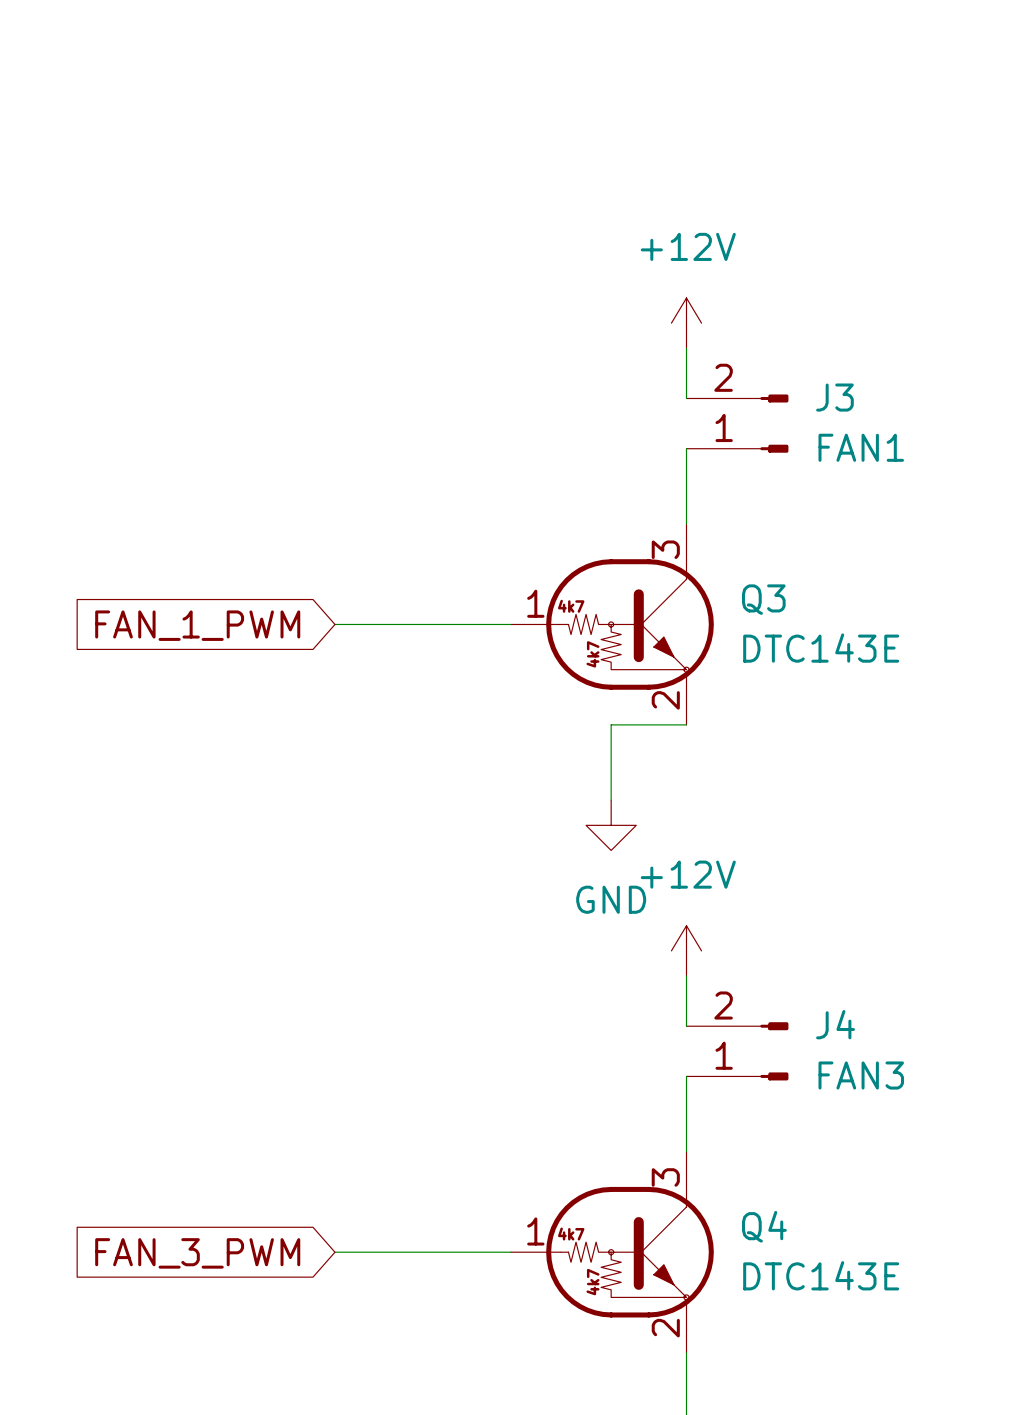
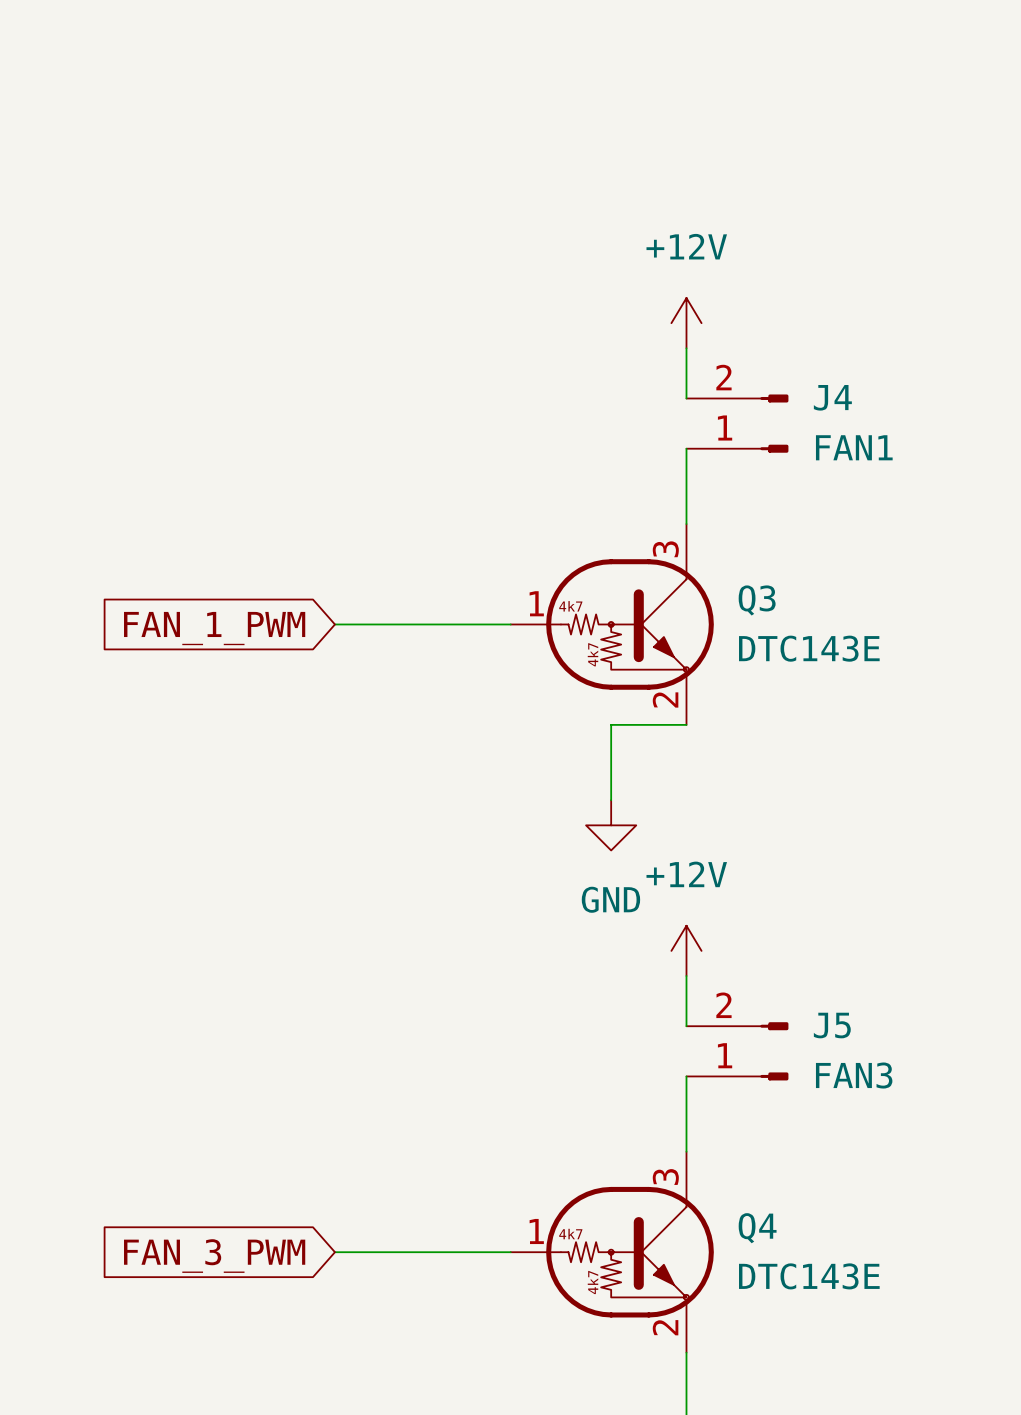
J3 name: J3 (834, 397) -> J4 (832, 397)
J4 name: J4 (835, 1024) -> J5 (832, 1025)

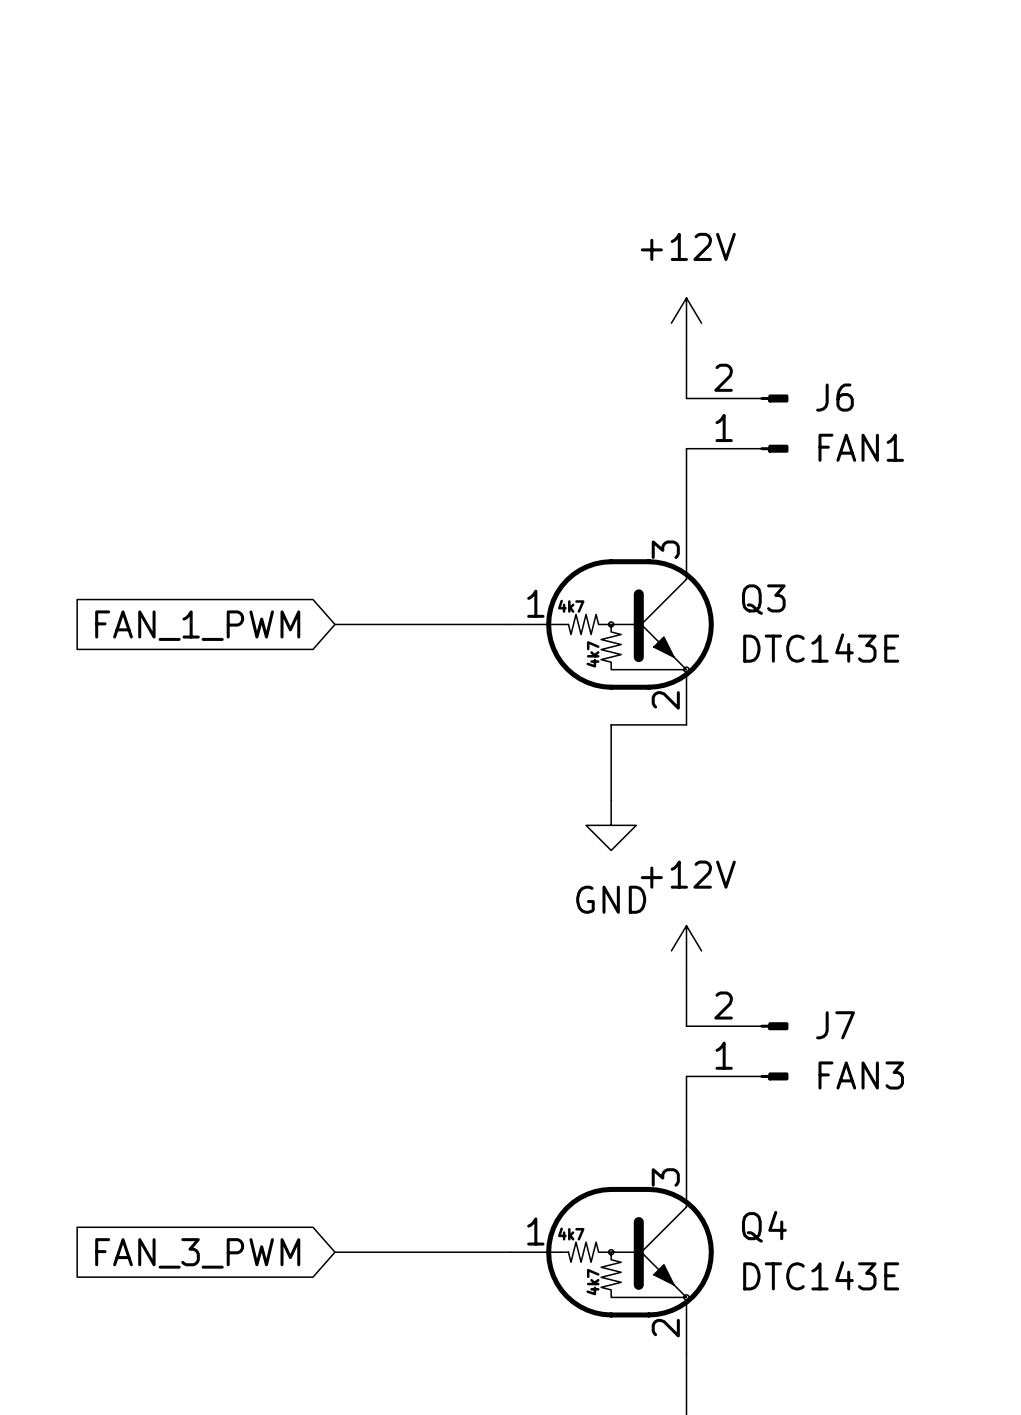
J4 name: J4 (832, 397) -> J6 (834, 397)
J5 name: J5 (832, 1025) -> J7 (835, 1025)

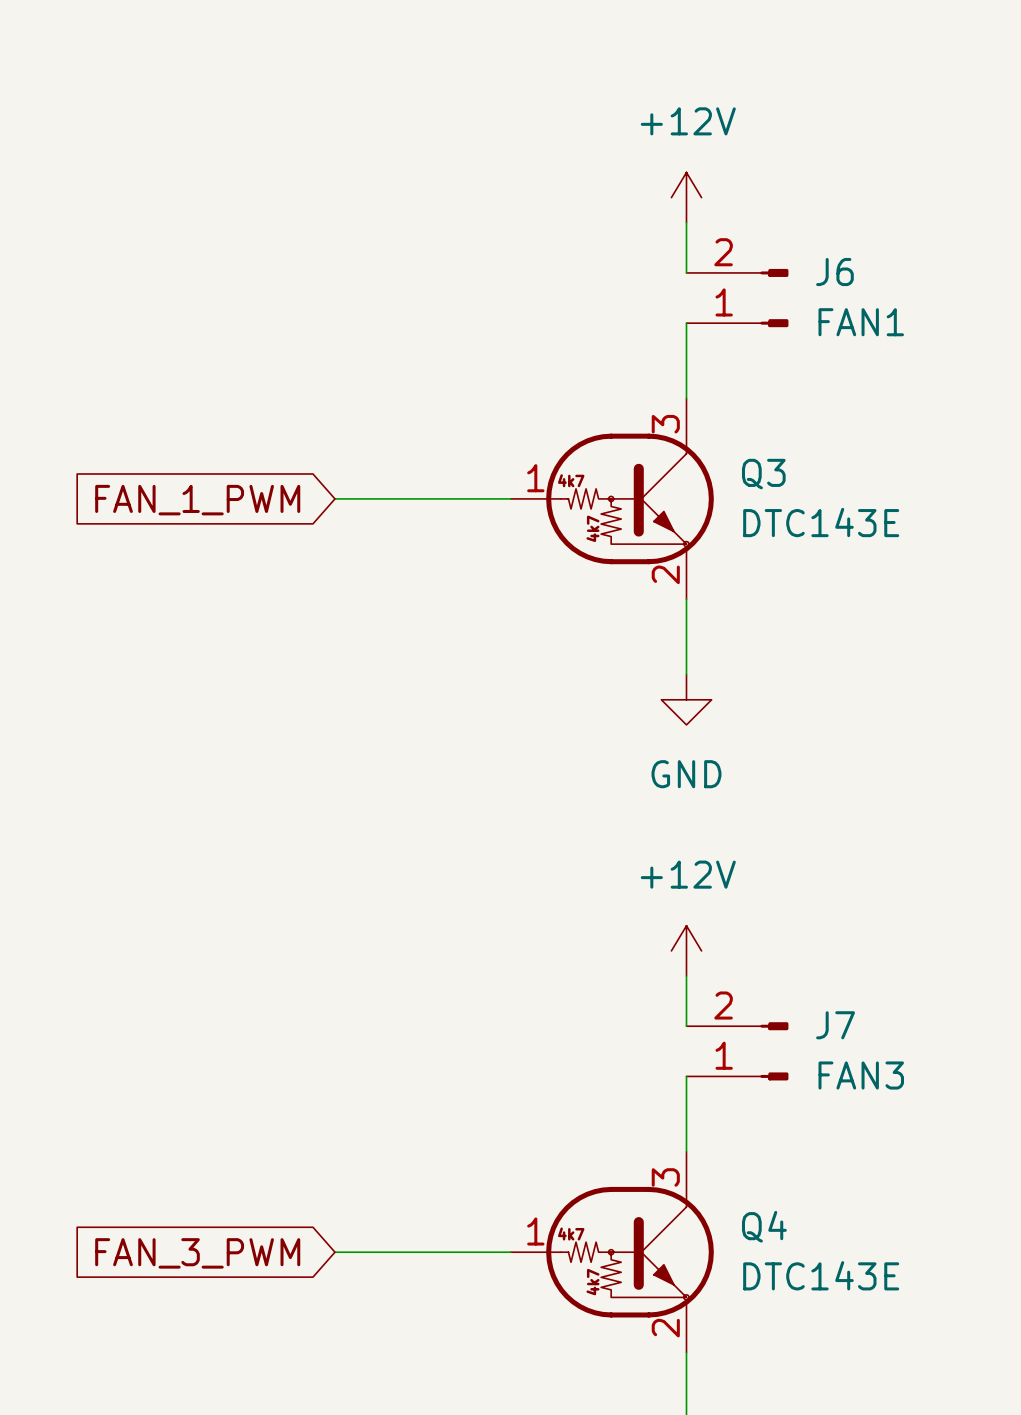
wire: none -> (686, 222) (686, 272)
power symbol position: +12V (686, 323) -> +12V (686, 197)
J6 position: (737, 423) -> (737, 298)
wire: (686, 448) (686, 524) -> (686, 599) (686, 674)
wire: (334, 624) (510, 624) -> (334, 498) (510, 498)
Q3 position: (612, 624) -> (612, 498)
global label position: FAN_1_PWM (197, 625) -> FAN_1_PWM (197, 500)
wire: (686, 724) (611, 724) (611, 800) -> none
power symbol position: GND (611, 825) -> GND (686, 699)

